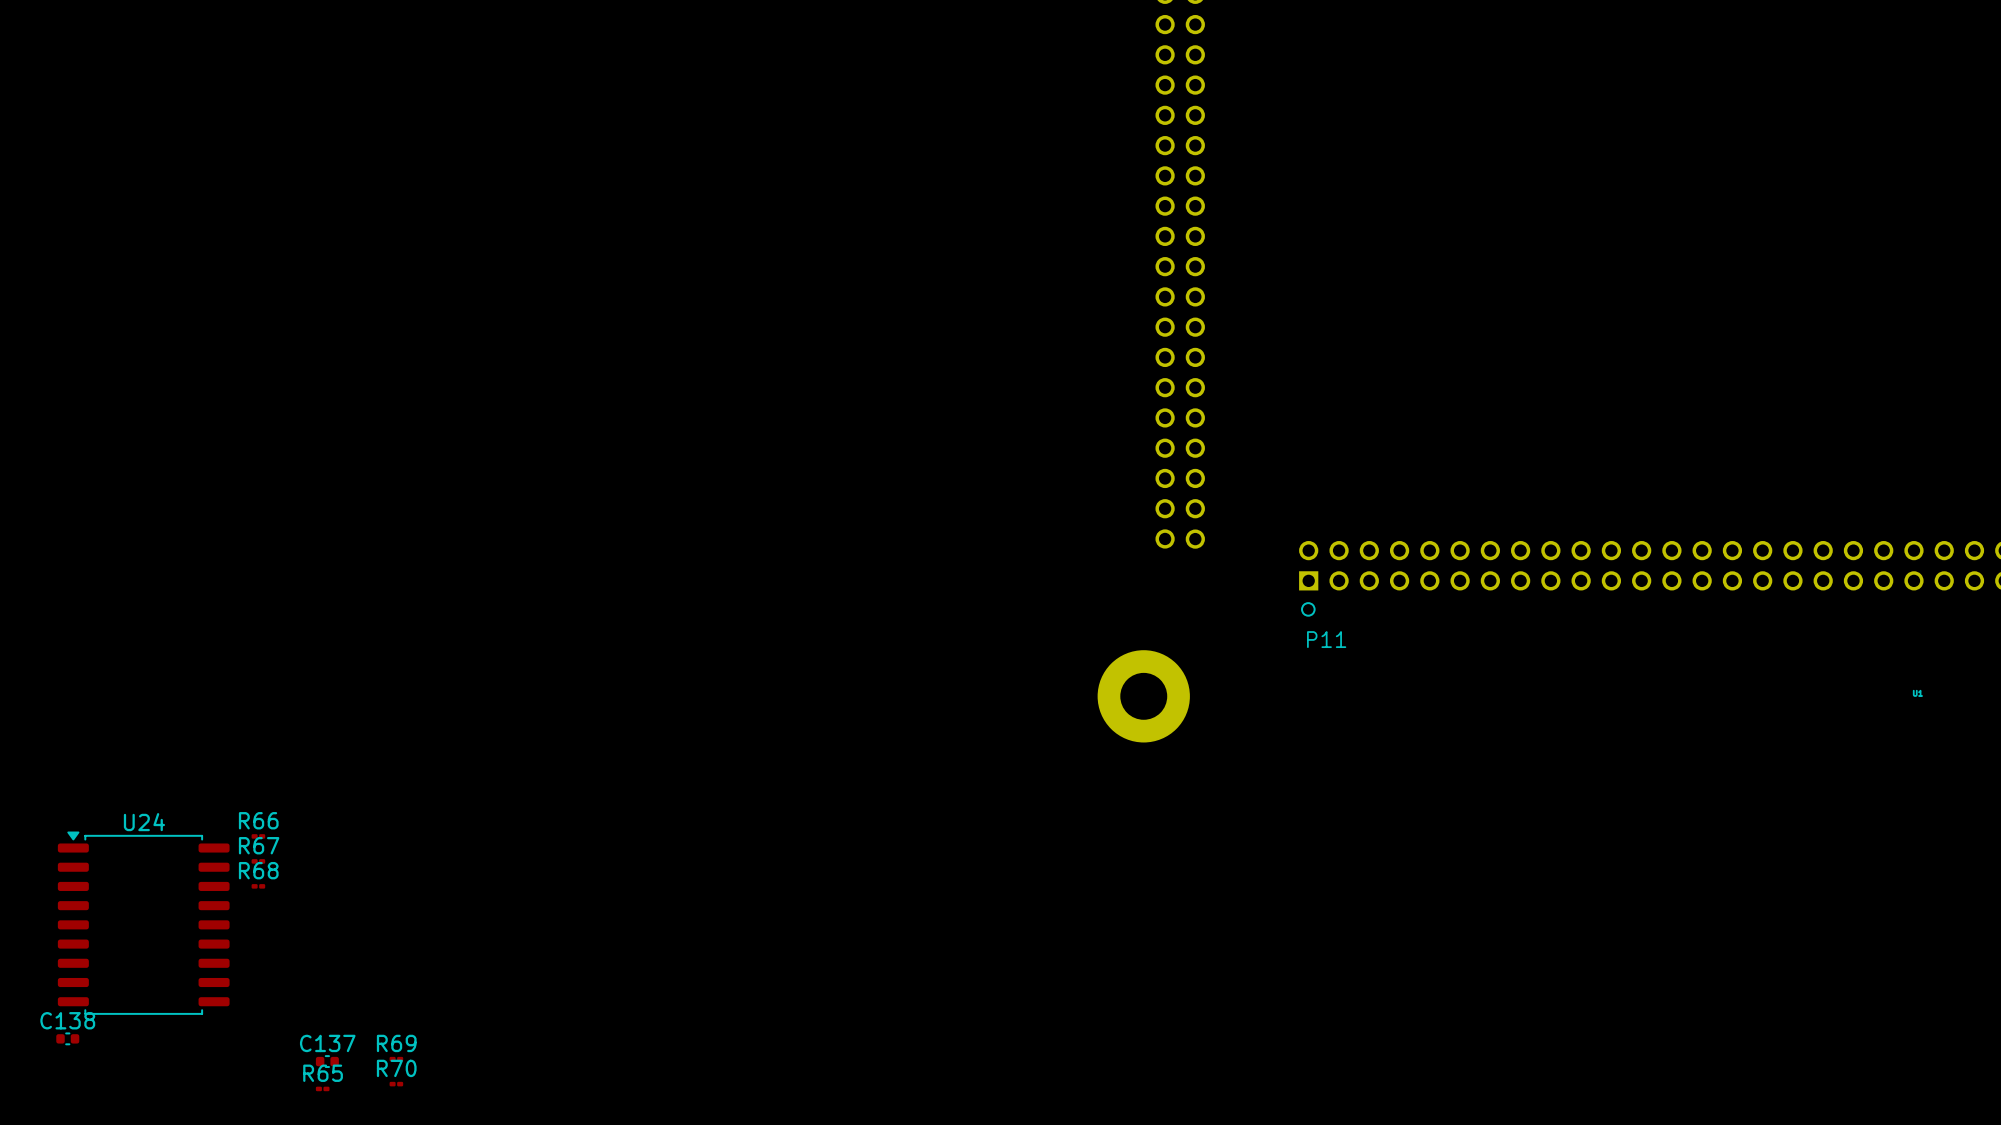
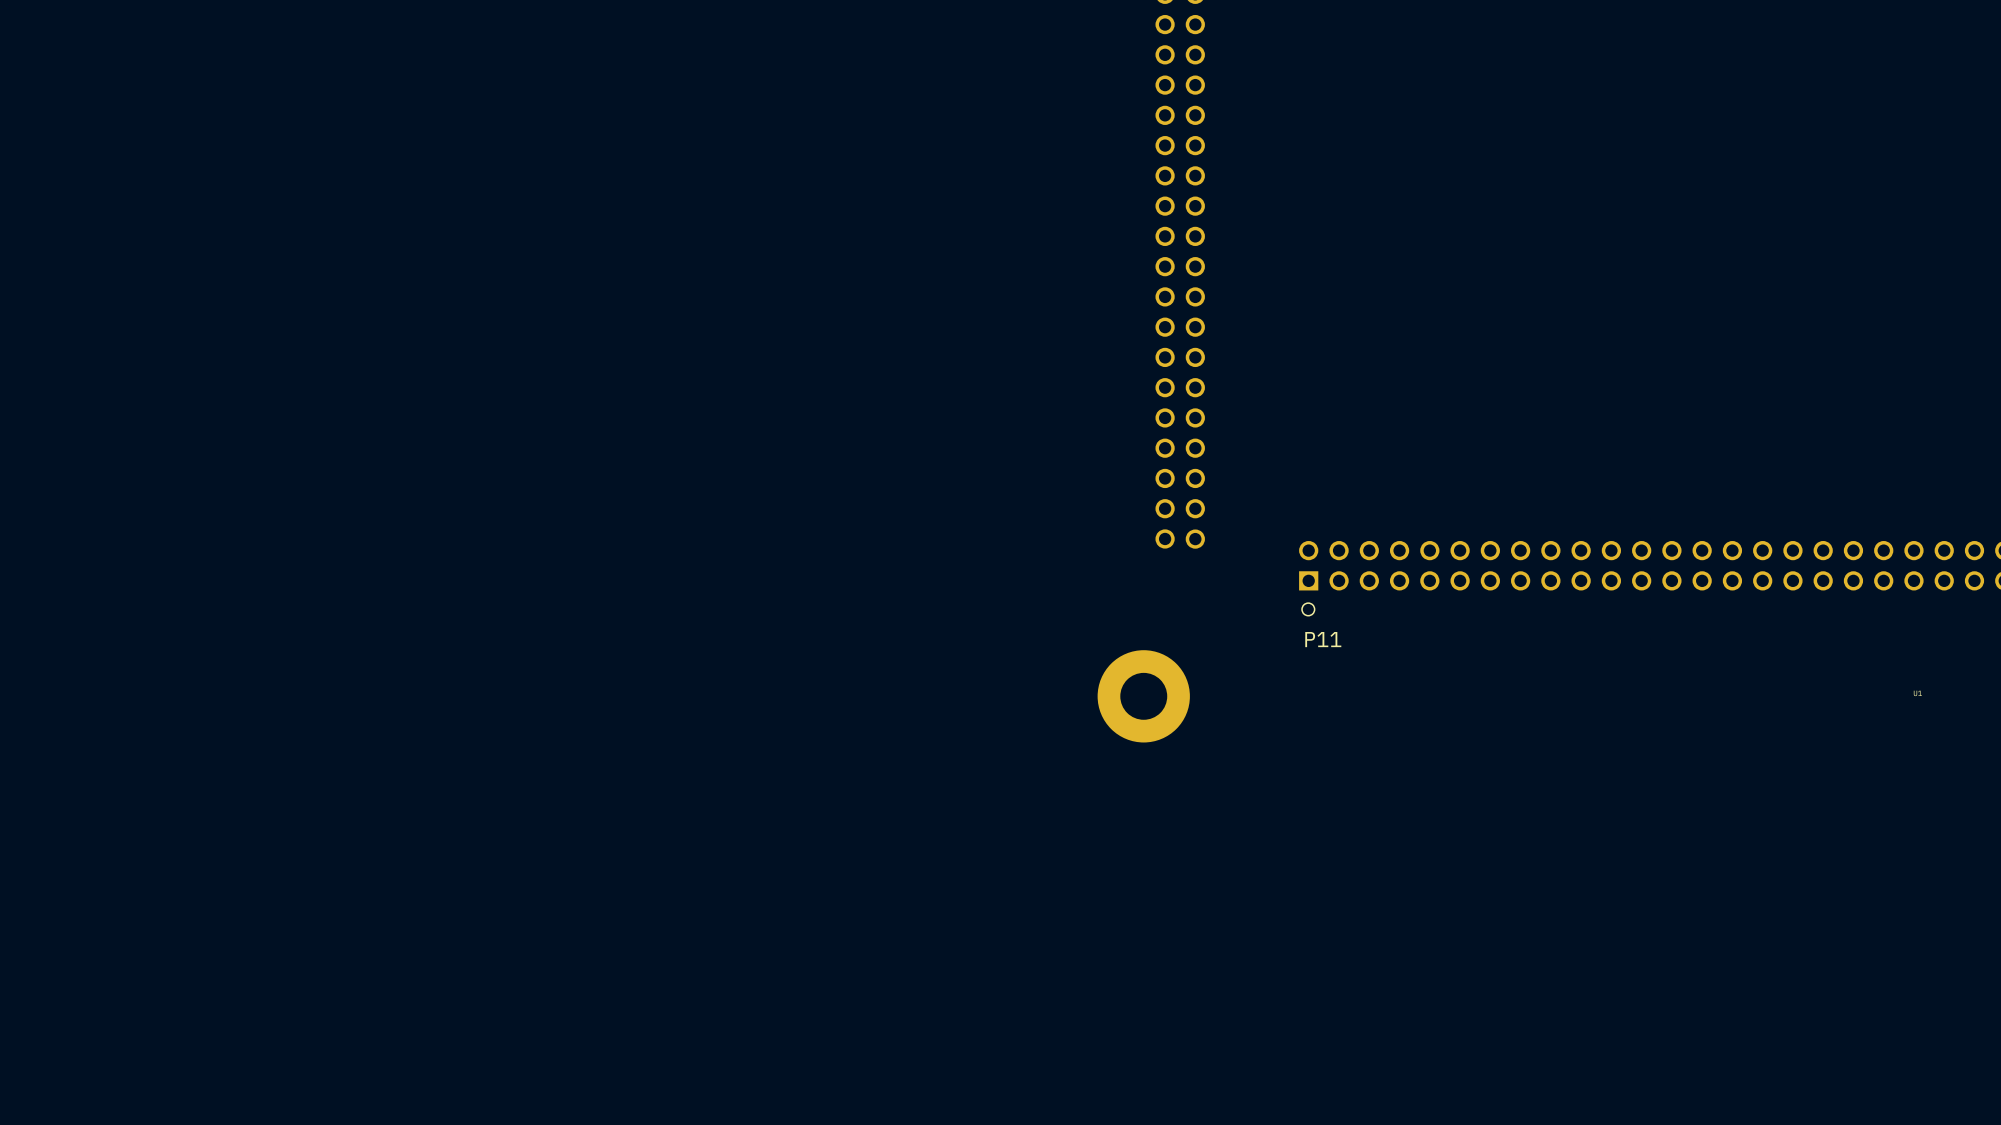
R66: (258, 836) -> none
R67: (258, 861) -> none
R68: (258, 886) -> none
U24: (143, 923) -> none
C138: (67, 1038) -> none
R69: (396, 1059) -> none
C137: (327, 1061) -> none
R70: (396, 1084) -> none
R65: (322, 1088) -> none

